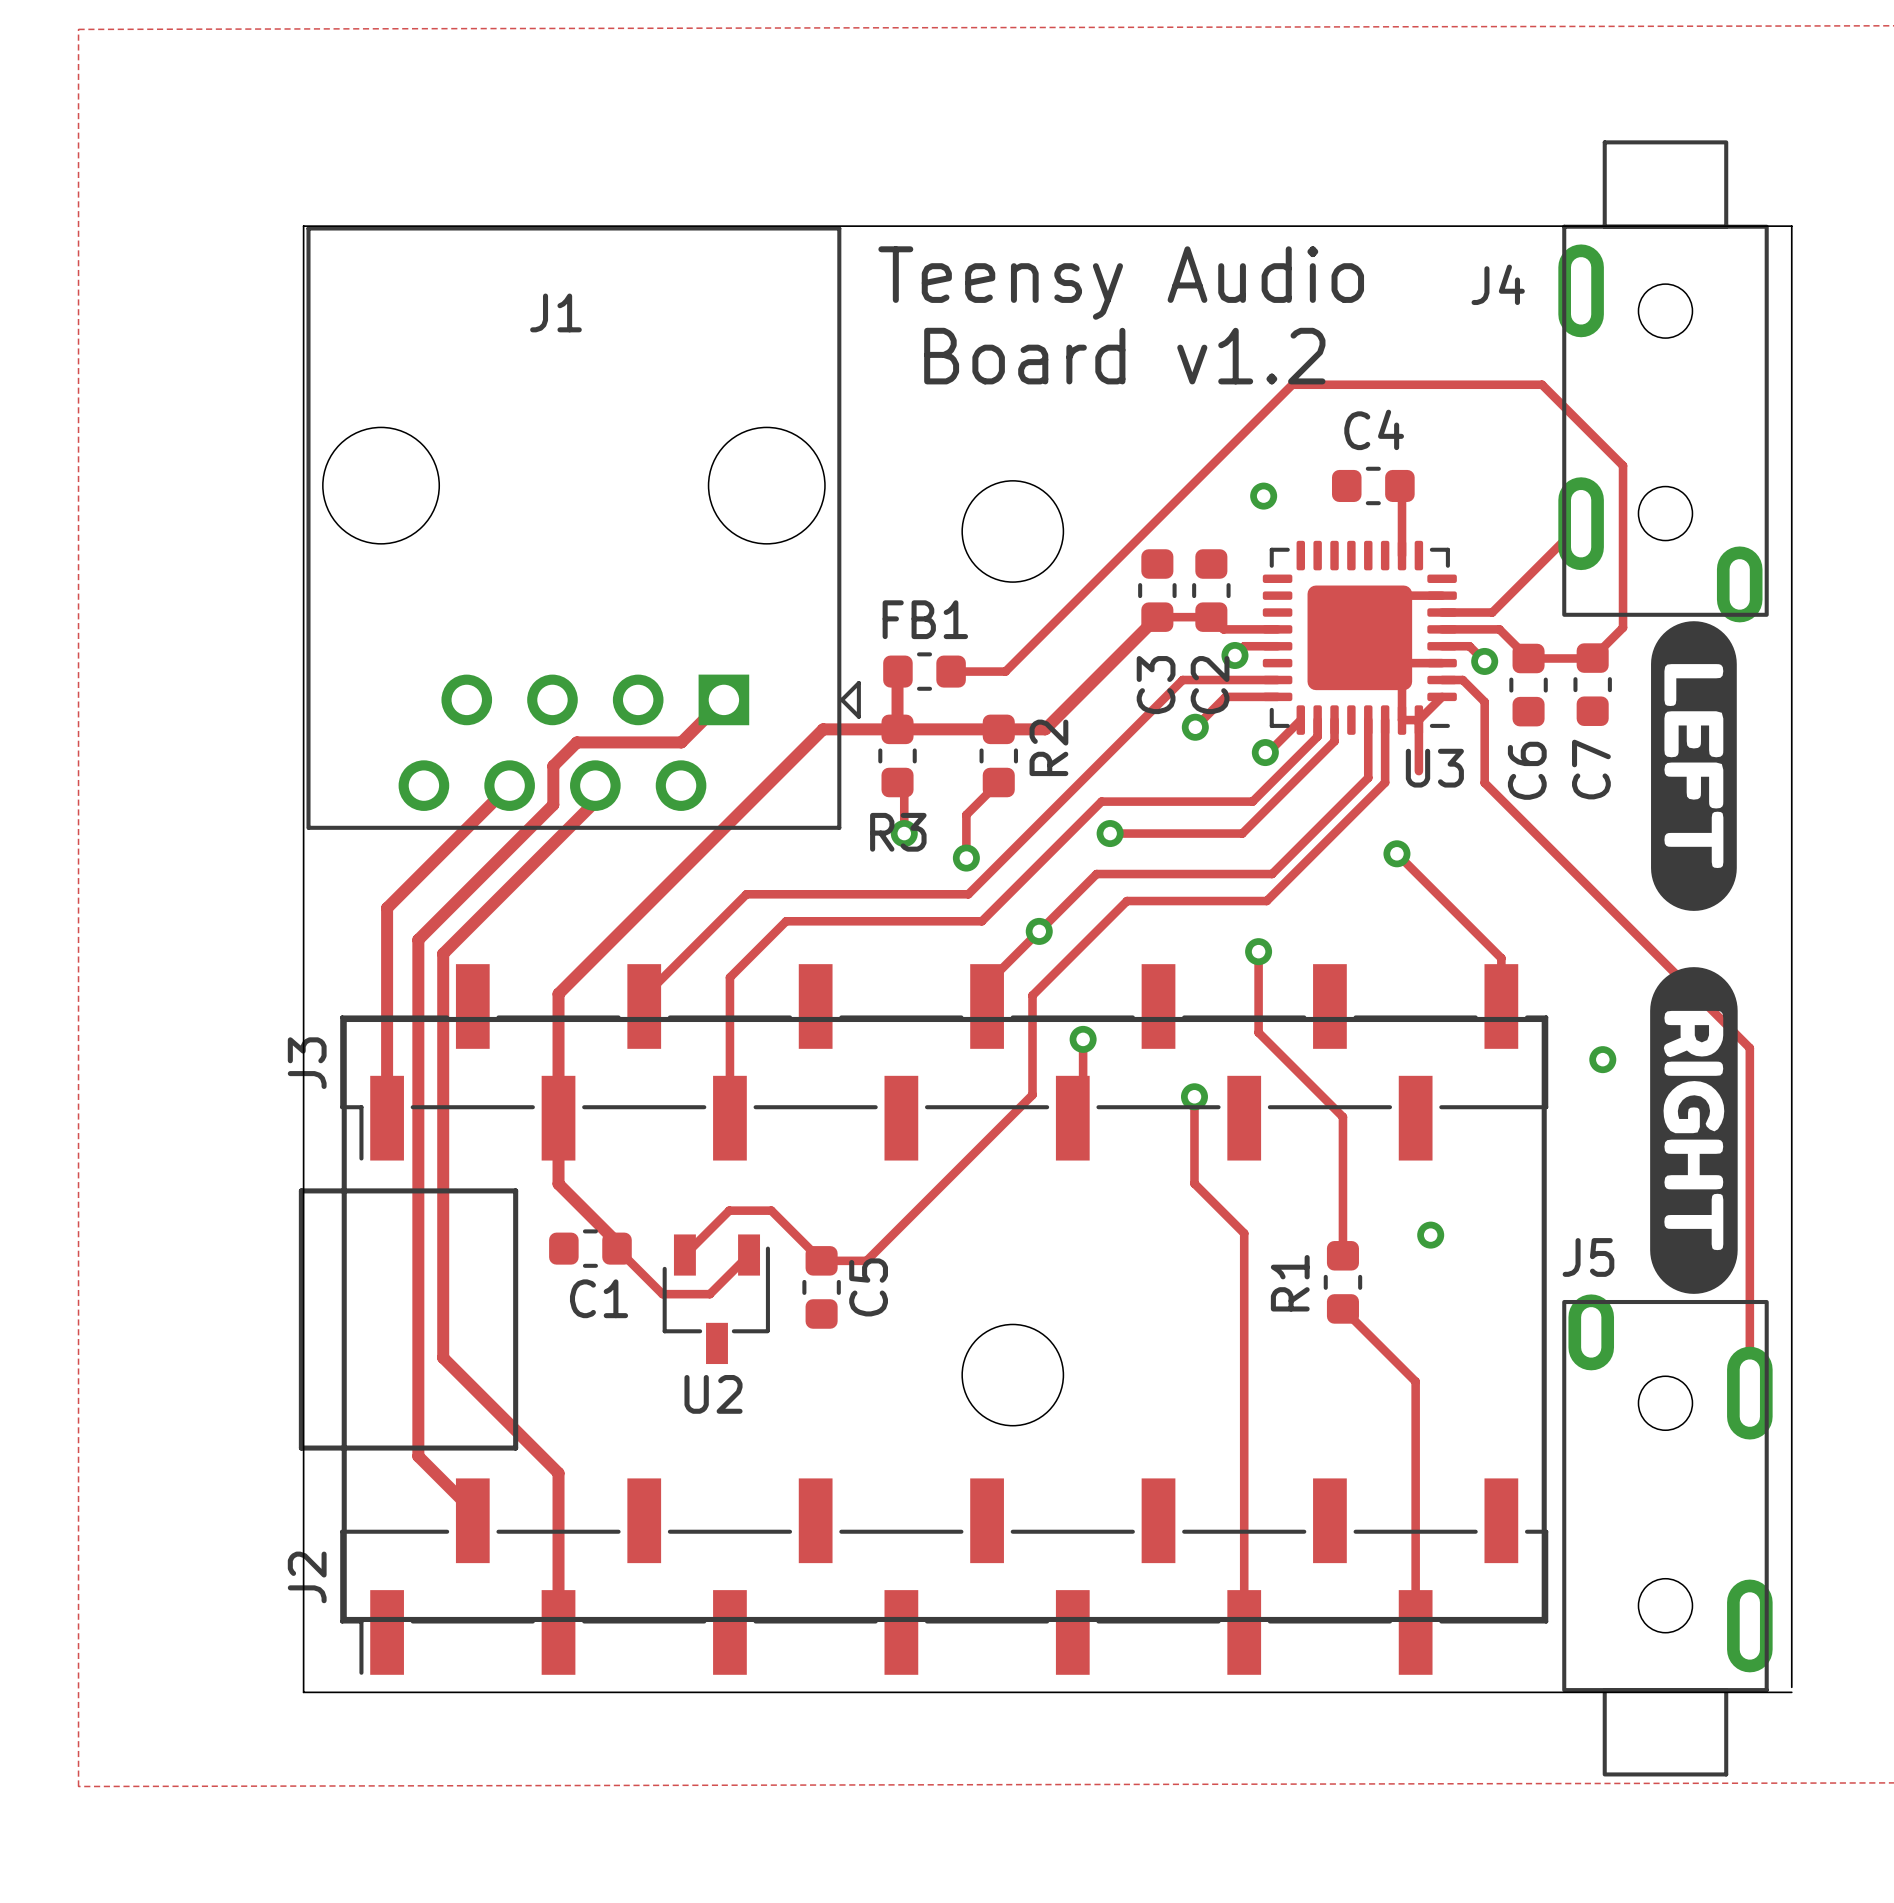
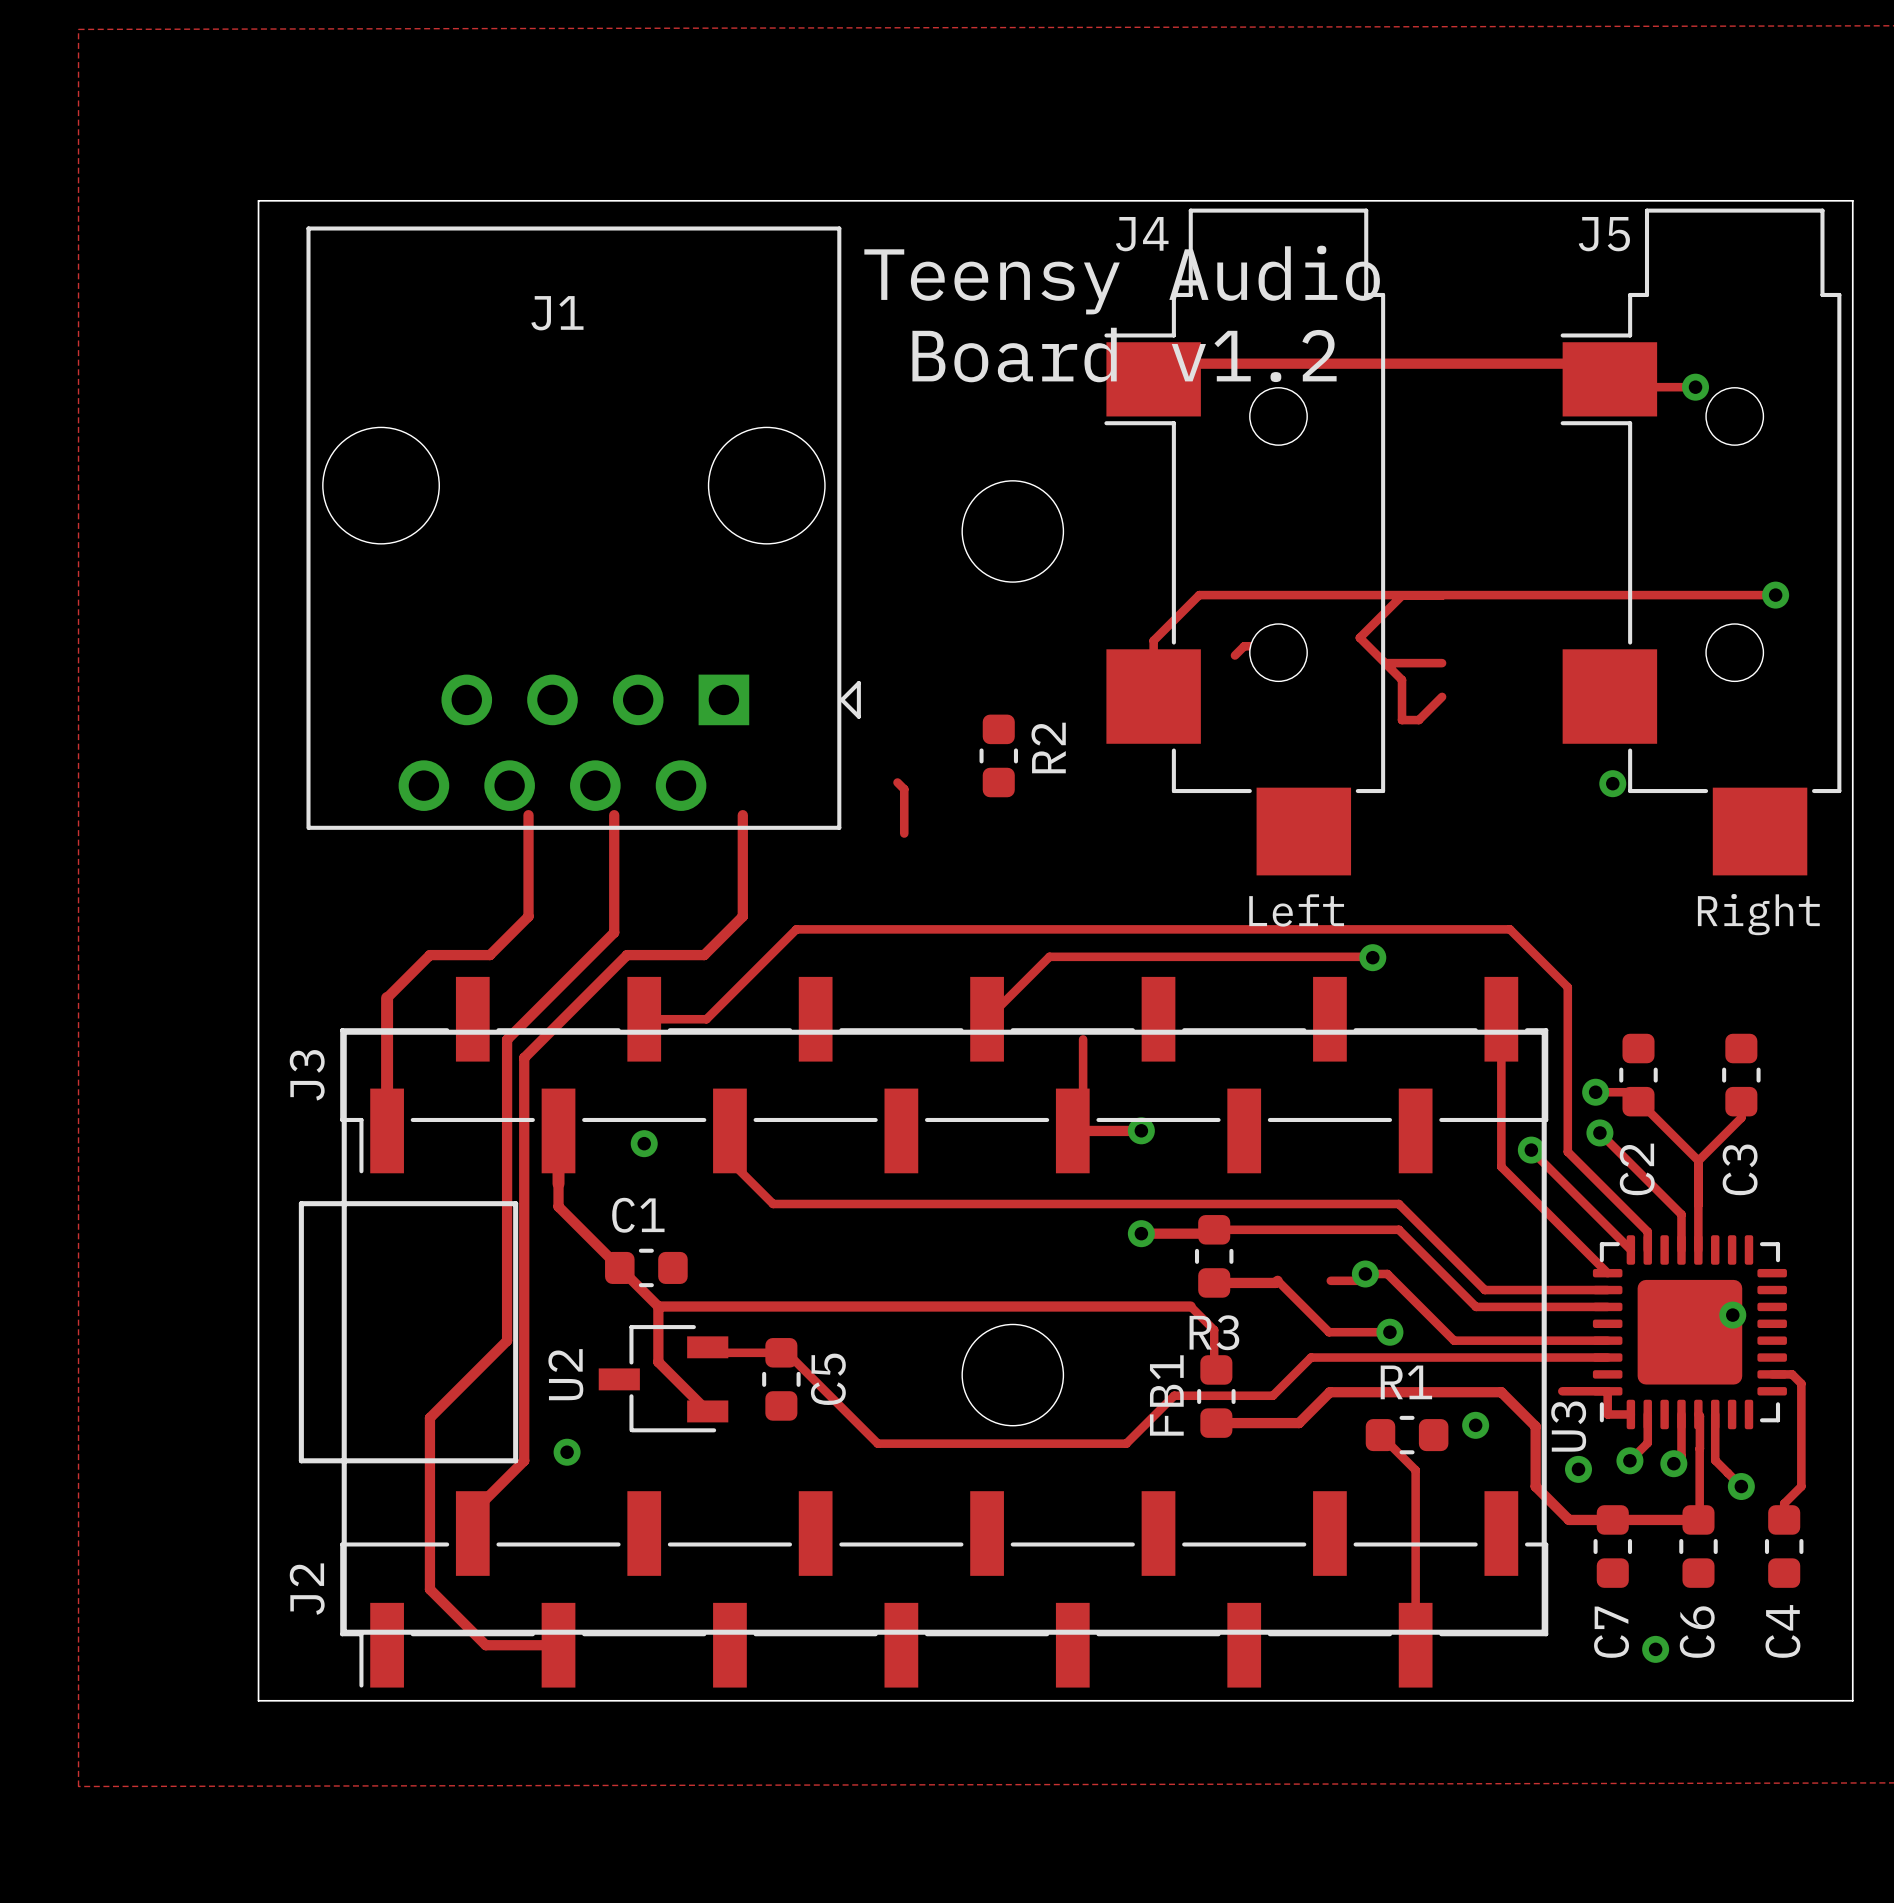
J4 footprint: [1558, 140, 1769, 623] -> [1104, 208, 1386, 876]
board edge: none -> (258, 200) (258, 1700) (1852, 1700) (1852, 200) (258, 200)
J4 name position: J4 (1498, 284) -> J4 (1142, 234)
track: none -> (1153, 379) (1169, 363) (1584, 363) (1599, 379) (1609, 379) (1617, 387) (1695, 387)
via: none -> (1695, 387)
C4 name position: C4 (1374, 429) -> C4 (1782, 1631)
C4 rotation: 0° (1373, 485) -> 90° clockwise (1784, 1546)
C4 position: (1373, 485) -> (1784, 1546)
track: (1399, 485) (1402, 488) (1402, 555) -> none
via: (1263, 496) -> none
track: (1581, 523) (1492, 612) (1442, 612) -> none
C3 position: (1157, 590) -> (1741, 1075)
C2 position: (1211, 590) -> (1638, 1075)
track: none -> (1775, 595) (1199, 595) (1153, 640) (1153, 696)
via: none -> (1775, 595)
FB1 name position: FB1 (925, 619) -> FB1 (1166, 1395)
drawing: [1651, 621, 1737, 911] -> none
track: (1277, 629) (1223, 629) (1211, 617) (1157, 617) (1045, 729) (823, 729) (558, 993) (558, 1130) -> none
track: (1442, 629) (1499, 629) (1528, 658) (1592, 658) (1623, 627) (1623, 465) (1542, 384) (1292, 384) (1005, 671) (951, 671) -> none
U3 rotation: 0° (1359, 637) -> 90° clockwise (1689, 1332)
U3 position: (1359, 637) -> (1689, 1332)
track: (1442, 646) (1469, 646) (1484, 661) -> none
via: (1234, 655) -> none
via: (1484, 661) -> none
track: (897, 671) (897, 729) -> none
FB1 rotation: 0° (924, 671) -> 90° clockwise (1216, 1396)
FB1 position: (924, 671) -> (1216, 1396)
track: (1277, 680) (1182, 680) (968, 894) (746, 894) (644, 996) -> none
track: (1442, 680) (1462, 680) (1484, 701) (1484, 782) (1749, 1048) (1749, 1383) -> none
C7 position: (1592, 684) -> (1612, 1546)
C6 position: (1528, 685) -> (1698, 1546)
track: (1277, 696) (1225, 696) (1195, 727) -> none
track: (723, 699) (681, 742) (576, 742) (553, 766) (553, 804) (418, 939) (418, 1456) (472, 1510) -> none
track: (1300, 720) (1268, 752) (1265, 752) -> none
track: (1317, 720) (1317, 736) (1252, 801) (1101, 801) (981, 921) (786, 921) (729, 977) (729, 1108) -> none
track: (1334, 720) (1334, 741) (1242, 833) (1110, 833) -> none
track: (1368, 720) (1368, 777) (1272, 874) (1096, 874) (987, 983) (987, 996) -> none
track: (1385, 720) (1385, 782) (1266, 901) (1126, 901) (1032, 995) (1032, 1094) (866, 1260) (821, 1260) (771, 1210) (729, 1210) (684, 1255) -> none
track: (1418, 720) (1418, 771) -> none
via: (1195, 727) -> none
via: (1265, 752) -> none
R3 position: (897, 755) -> (1214, 1256)
track: (998, 782) (966, 814) (966, 858) -> none
via: none -> (1612, 783)
track: (509, 785) (387, 908) (387, 997) -> (528, 815) (528, 916) (489, 955) (429, 955) (387, 997)
track: (595, 785) (595, 801) (443, 953) (443, 1357) (558, 1473) (558, 1622) -> none
track: none -> (614, 815) (614, 932) (507, 1039) (507, 1340) (429, 1417) (429, 1589) (485, 1645) (558, 1645)
track: none -> (742, 815) (742, 916) (704, 955) (627, 955) (524, 1057) (524, 1460) (472, 1512) (472, 1533)
via: (904, 833) -> none
via: (1110, 833) -> none
track: (1396, 853) (1501, 958) (1501, 996) -> none
via: (1396, 853) -> none
via: (966, 858) -> none
text: none -> Left (1296, 910)
text: none -> Right (1758, 914)
via: (1039, 931) -> none
track: (1258, 951) (1258, 1032) (1342, 1117) (1342, 1255) -> none
via: (1258, 951) -> none
track: none -> (1372, 957) (1049, 956) (987, 1019)
via: none -> (1372, 957)
drawing: [1650, 967, 1738, 1294] -> none
track: none -> (644, 1019) (706, 1019) (796, 929) (1509, 929) (1567, 987) (1567, 1151) (1647, 1231) (1647, 1249)
track: none -> (1501, 1019) (1501, 1166) (1607, 1273)
via: (1083, 1039) -> none
via position: (1602, 1059) -> (1595, 1092)
J3 position: (944, 1087) -> (944, 1100)
track: none -> (1595, 1092) (1629, 1092) (1698, 1160) (1698, 1249)
track: (1194, 1096) (1194, 1183) (1244, 1233) (1244, 1622) -> none
via: (1194, 1096) -> none
track: none -> (1741, 1101) (1741, 1117) (1698, 1160)
track: none -> (729, 1130) (729, 1160) (773, 1204) (1398, 1204) (1484, 1290) (1607, 1290)
track: none -> (1072, 1130) (1141, 1130)
via: none -> (1141, 1130)
track: none -> (1599, 1132) (1681, 1214) (1681, 1249)
via: none -> (1599, 1132)
via: none -> (644, 1143)
track: none -> (1531, 1150) (1630, 1249)
via: none -> (1531, 1150)
track: (558, 1183) (619, 1245) -> (558, 1183) (558, 1206) (658, 1306)
track: none -> (1141, 1233) (1210, 1233) (1214, 1229) (1398, 1229) (1476, 1306) (1607, 1306)
via: none -> (1141, 1233)
via: (1430, 1235) -> none
C1 position: (590, 1248) -> (646, 1267)
track: (617, 1248) (662, 1294) (709, 1294) (749, 1255) -> none
via: none -> (1365, 1274)
track: none -> (1330, 1280) (1358, 1280) (1365, 1274) (1387, 1274) (1454, 1340) (1607, 1340)
R1 rotation: 0° (1342, 1282) -> 90° clockwise (1407, 1435)
R1 position: (1342, 1282) -> (1407, 1435)
track: none -> (1216, 1285) (1214, 1282) (1275, 1282) (1277, 1280) (1329, 1332) (1389, 1332)
C5 position: (821, 1287) -> (781, 1379)
J5 footprint: [1562, 1294, 1773, 1777] -> [1560, 208, 1842, 876]
C1 name position: C1 (599, 1298) -> C1 (638, 1215)
U2 rotation: 0° (716, 1299) -> 90° clockwise (663, 1378)
U2 position: (716, 1299) -> (663, 1378)
track: none -> (658, 1306) (658, 1362) (707, 1411)
track: none -> (658, 1306) (1190, 1306) (1214, 1330) (1214, 1367) (1216, 1369)
track: (1342, 1308) (1415, 1381) (1415, 1470) -> (1380, 1435) (1415, 1470)
via: none -> (1732, 1315)
part position: (922, 1319) -> (922, 1332)
via: none -> (1389, 1332)
track: none -> (707, 1347) (713, 1352) (786, 1352) (877, 1443) (1126, 1443) (1174, 1395) (1272, 1395) (1311, 1357) (1607, 1357)
track: none -> (1772, 1374) (1792, 1374) (1801, 1383) (1801, 1486) (1784, 1503) (1784, 1519)
track: none -> (1562, 1391) (1607, 1391) (1607, 1414) (1630, 1414)
track: none -> (1647, 1414) (1647, 1442) (1629, 1460)
track: none -> (1681, 1414) (1681, 1456) (1673, 1463)
track: none -> (1698, 1414) (1699, 1448)
track: none -> (1715, 1414) (1715, 1460) (1741, 1486)
track: none -> (1216, 1423) (1299, 1423) (1329, 1392) (1501, 1392) (1535, 1426) (1535, 1486) (1569, 1519) (1698, 1519) (1699, 1449)
via: none -> (1475, 1425)
via: none -> (567, 1452)
via: none -> (1629, 1460)
via: none -> (1673, 1463)
via: none -> (1578, 1469)
via: none -> (1741, 1486)
J2 position: (944, 1602) -> (944, 1615)
via: none -> (1655, 1649)
board edge: (1791, 1687) (1791, 226) (303, 226) (303, 1692) (1791, 1692) -> none

